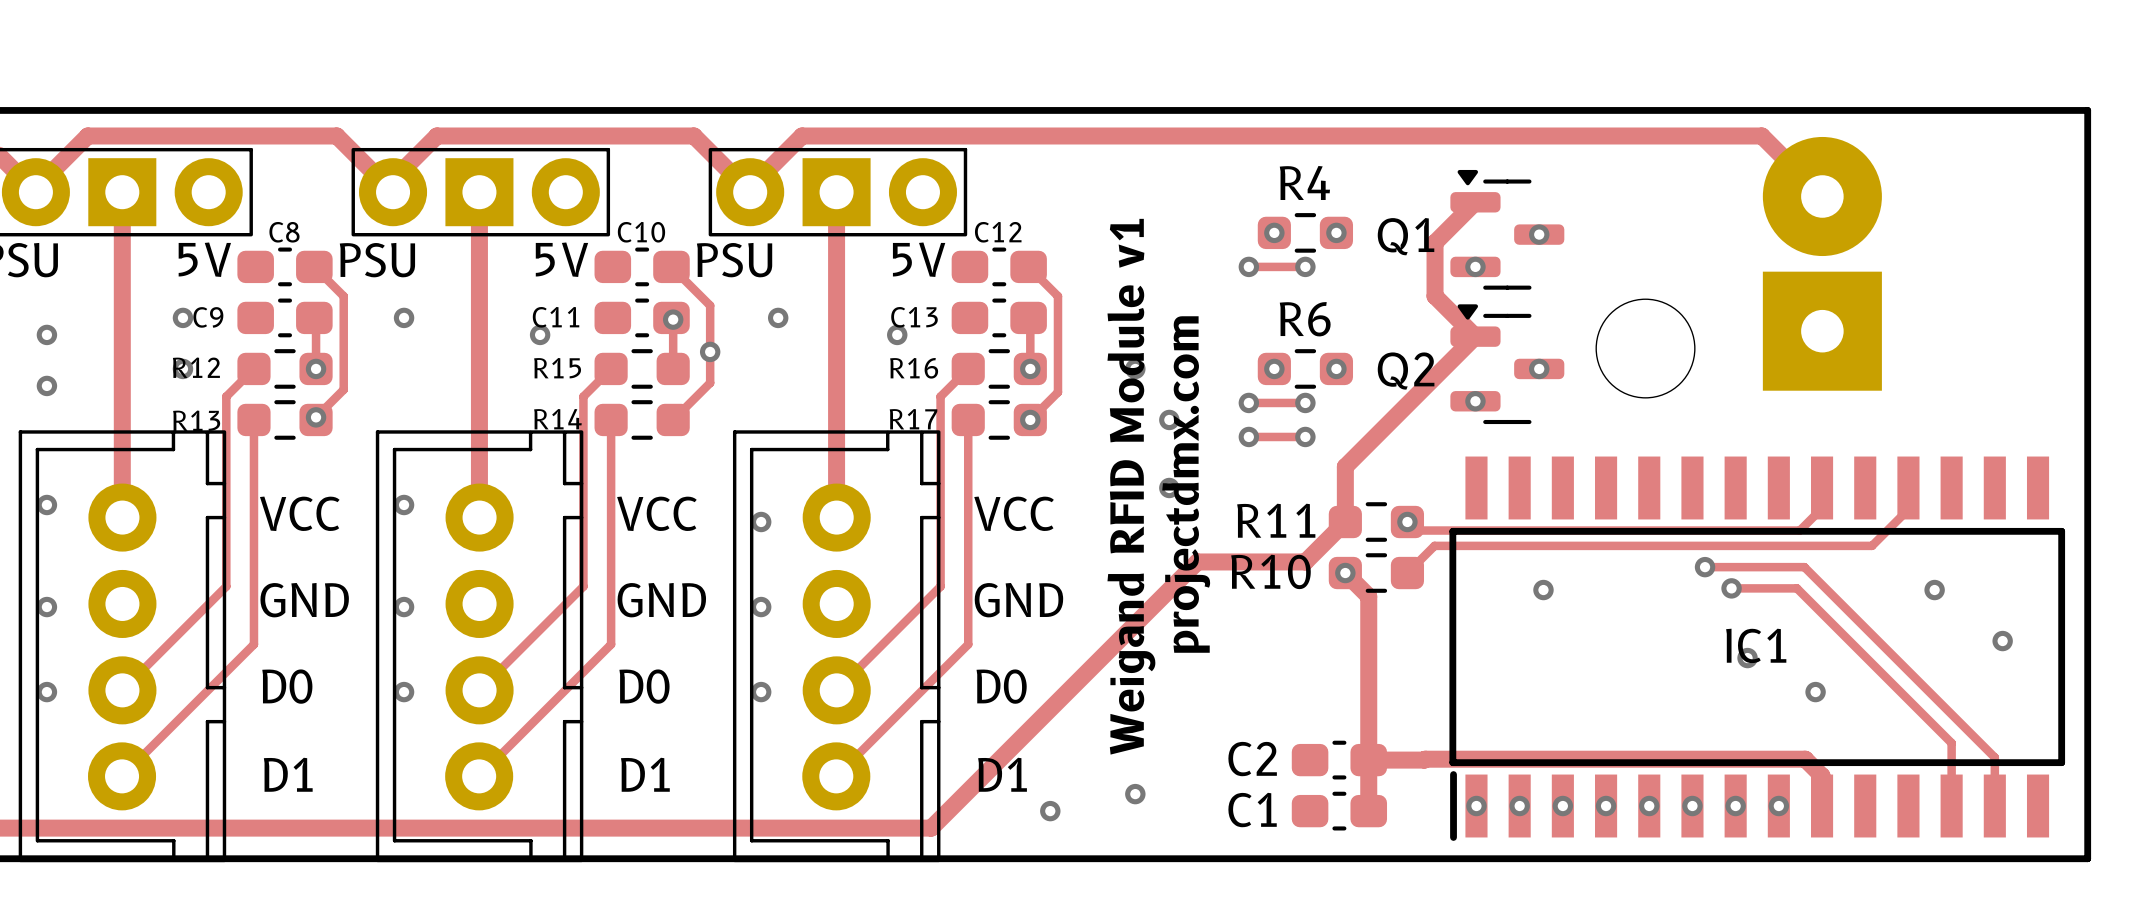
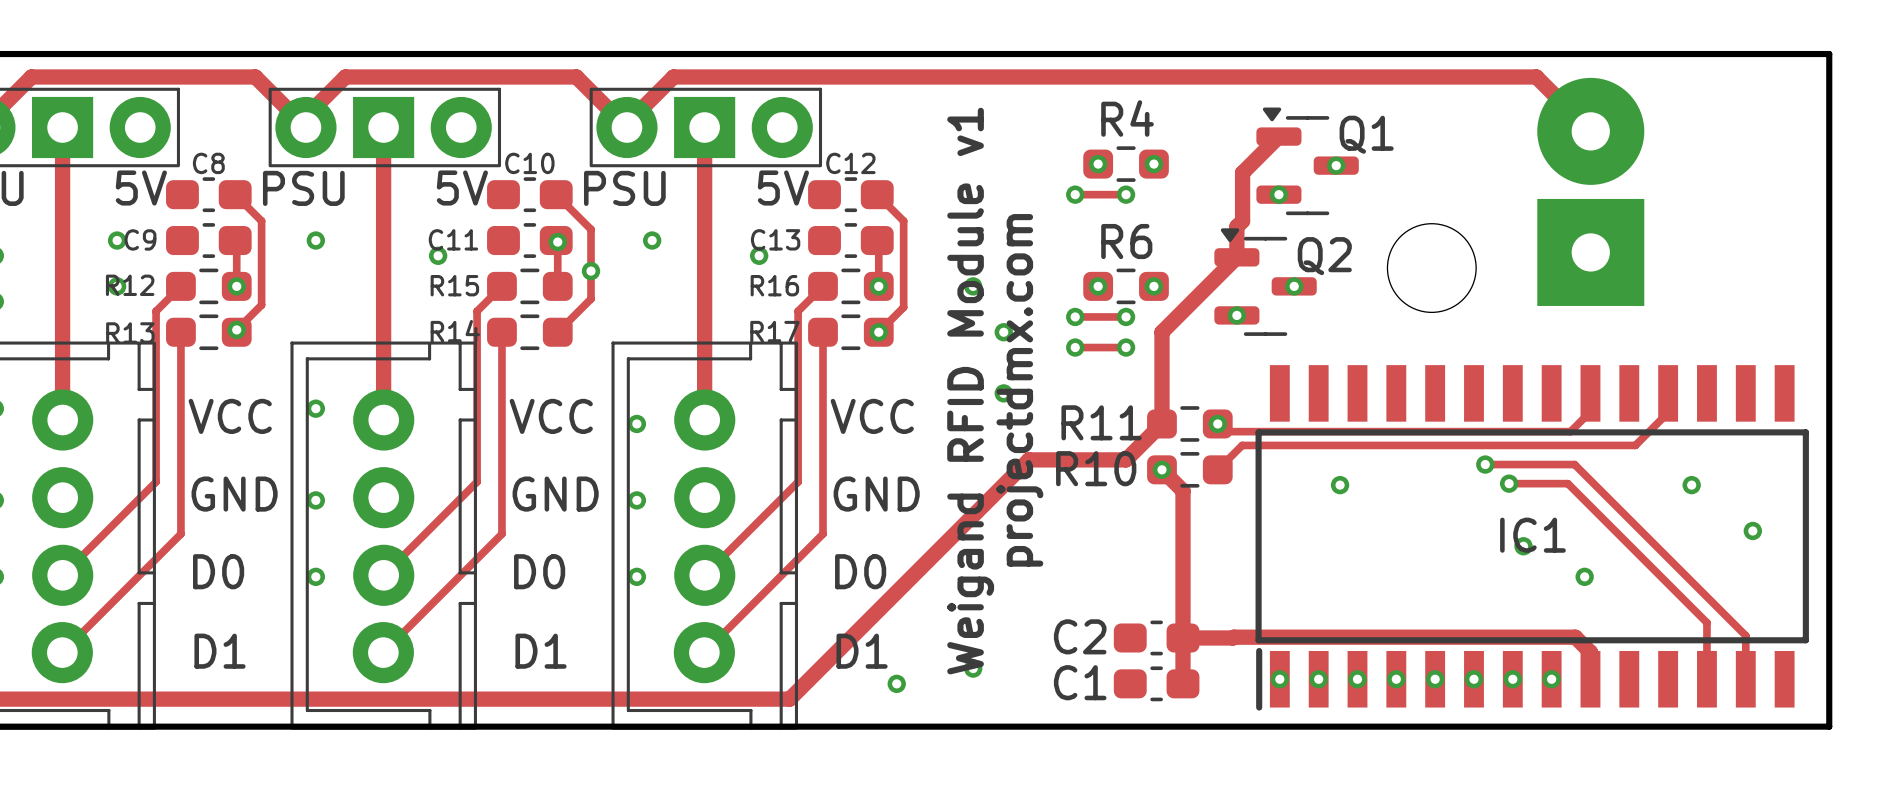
Q1 name position: Q1 (1406, 236) -> Q1 (1366, 134)
track: (1435, 296) (1475, 336) (1345, 466) -> (1242, 221) (1236, 226) (1236, 257) (1161, 332) (1161, 374)
Q2 position: (1507, 364) -> (1265, 282)
via: none -> (1294, 286)
via: (1539, 368) -> none
Q2 name position: Q2 (1406, 371) -> Q2 (1324, 256)
via: none -> (1236, 315)
via: (1475, 401) -> none

